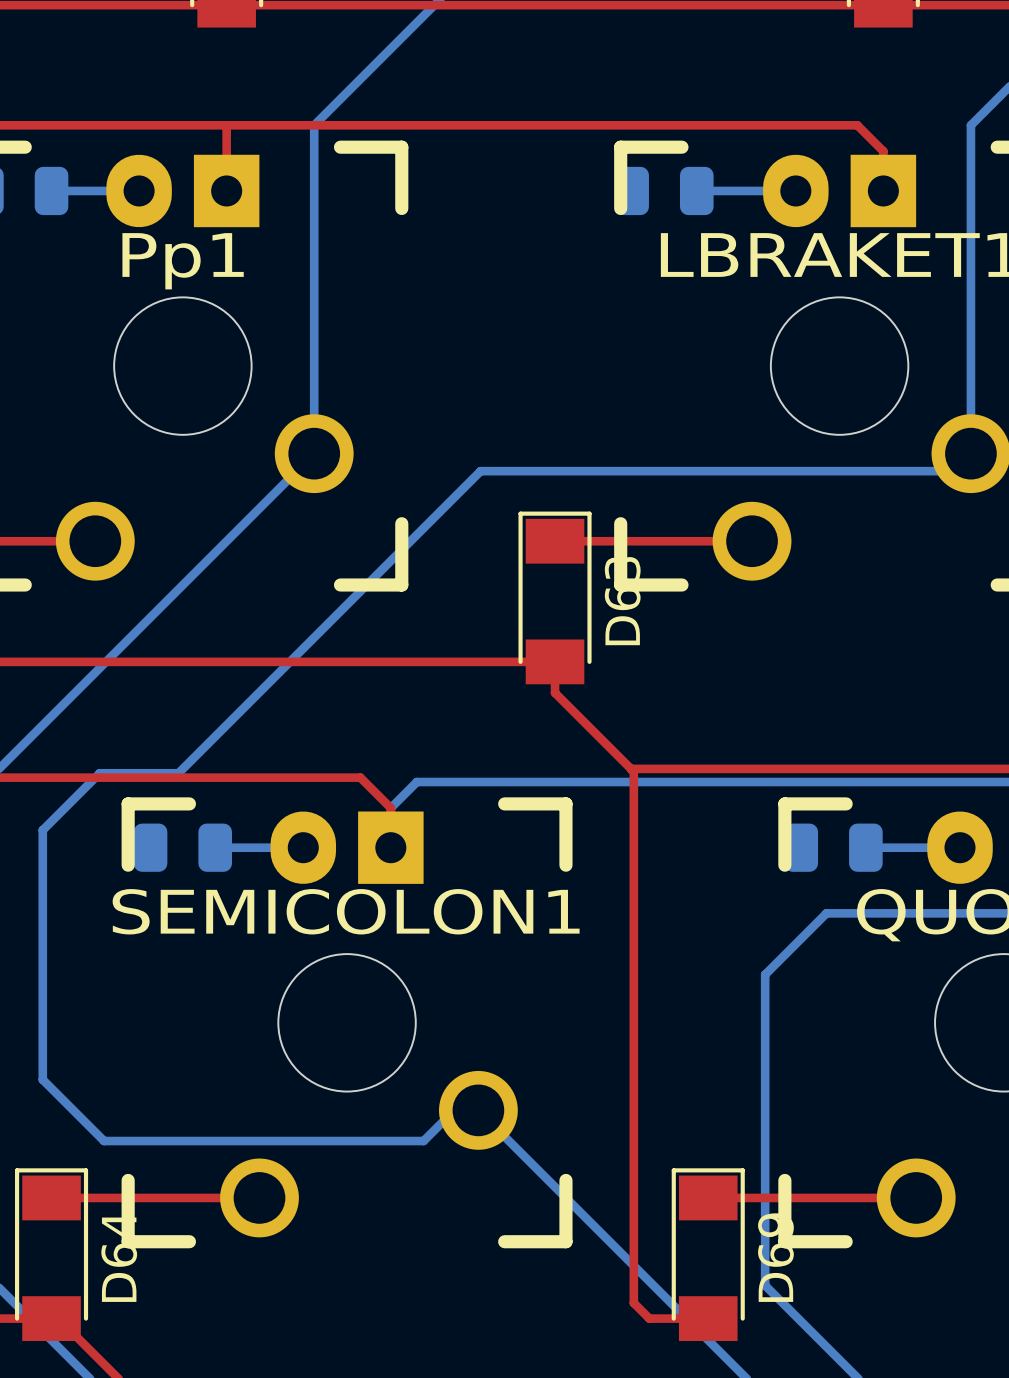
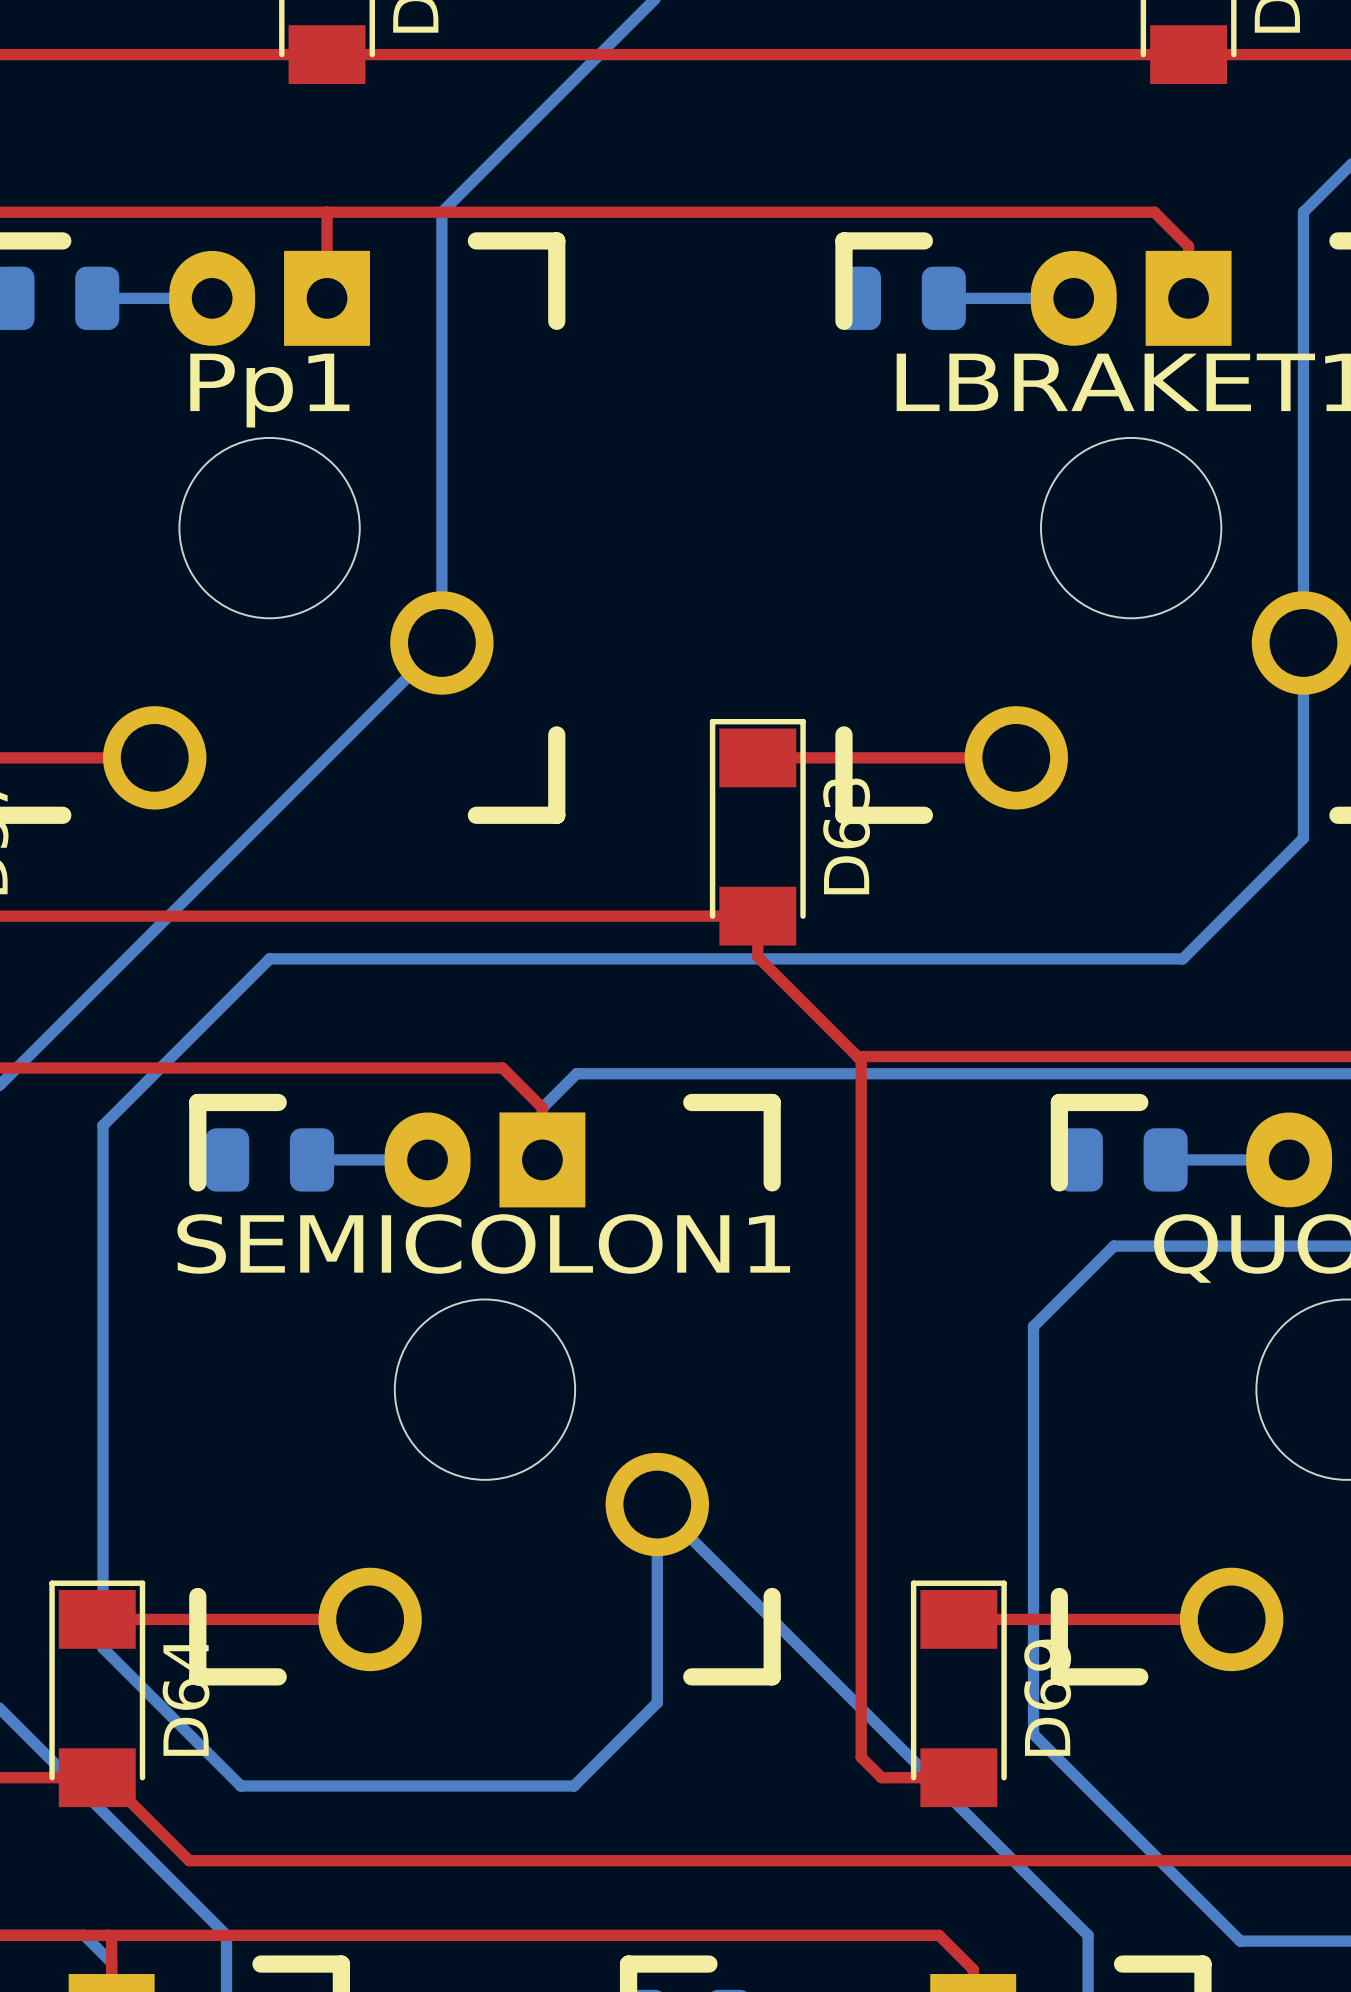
bottom track: (970, 453) (953, 471) (480, 471) (178, 773) (99, 773) (42, 830) (42, 1079) (104, 1141) (423, 1141) (454, 1110) (478, 1110) -> (1303, 642) (1303, 838) (1182, 958) (269, 958) (103, 1125) (103, 1648) (240, 1785) (574, 1785) (657, 1702) (657, 1504)

